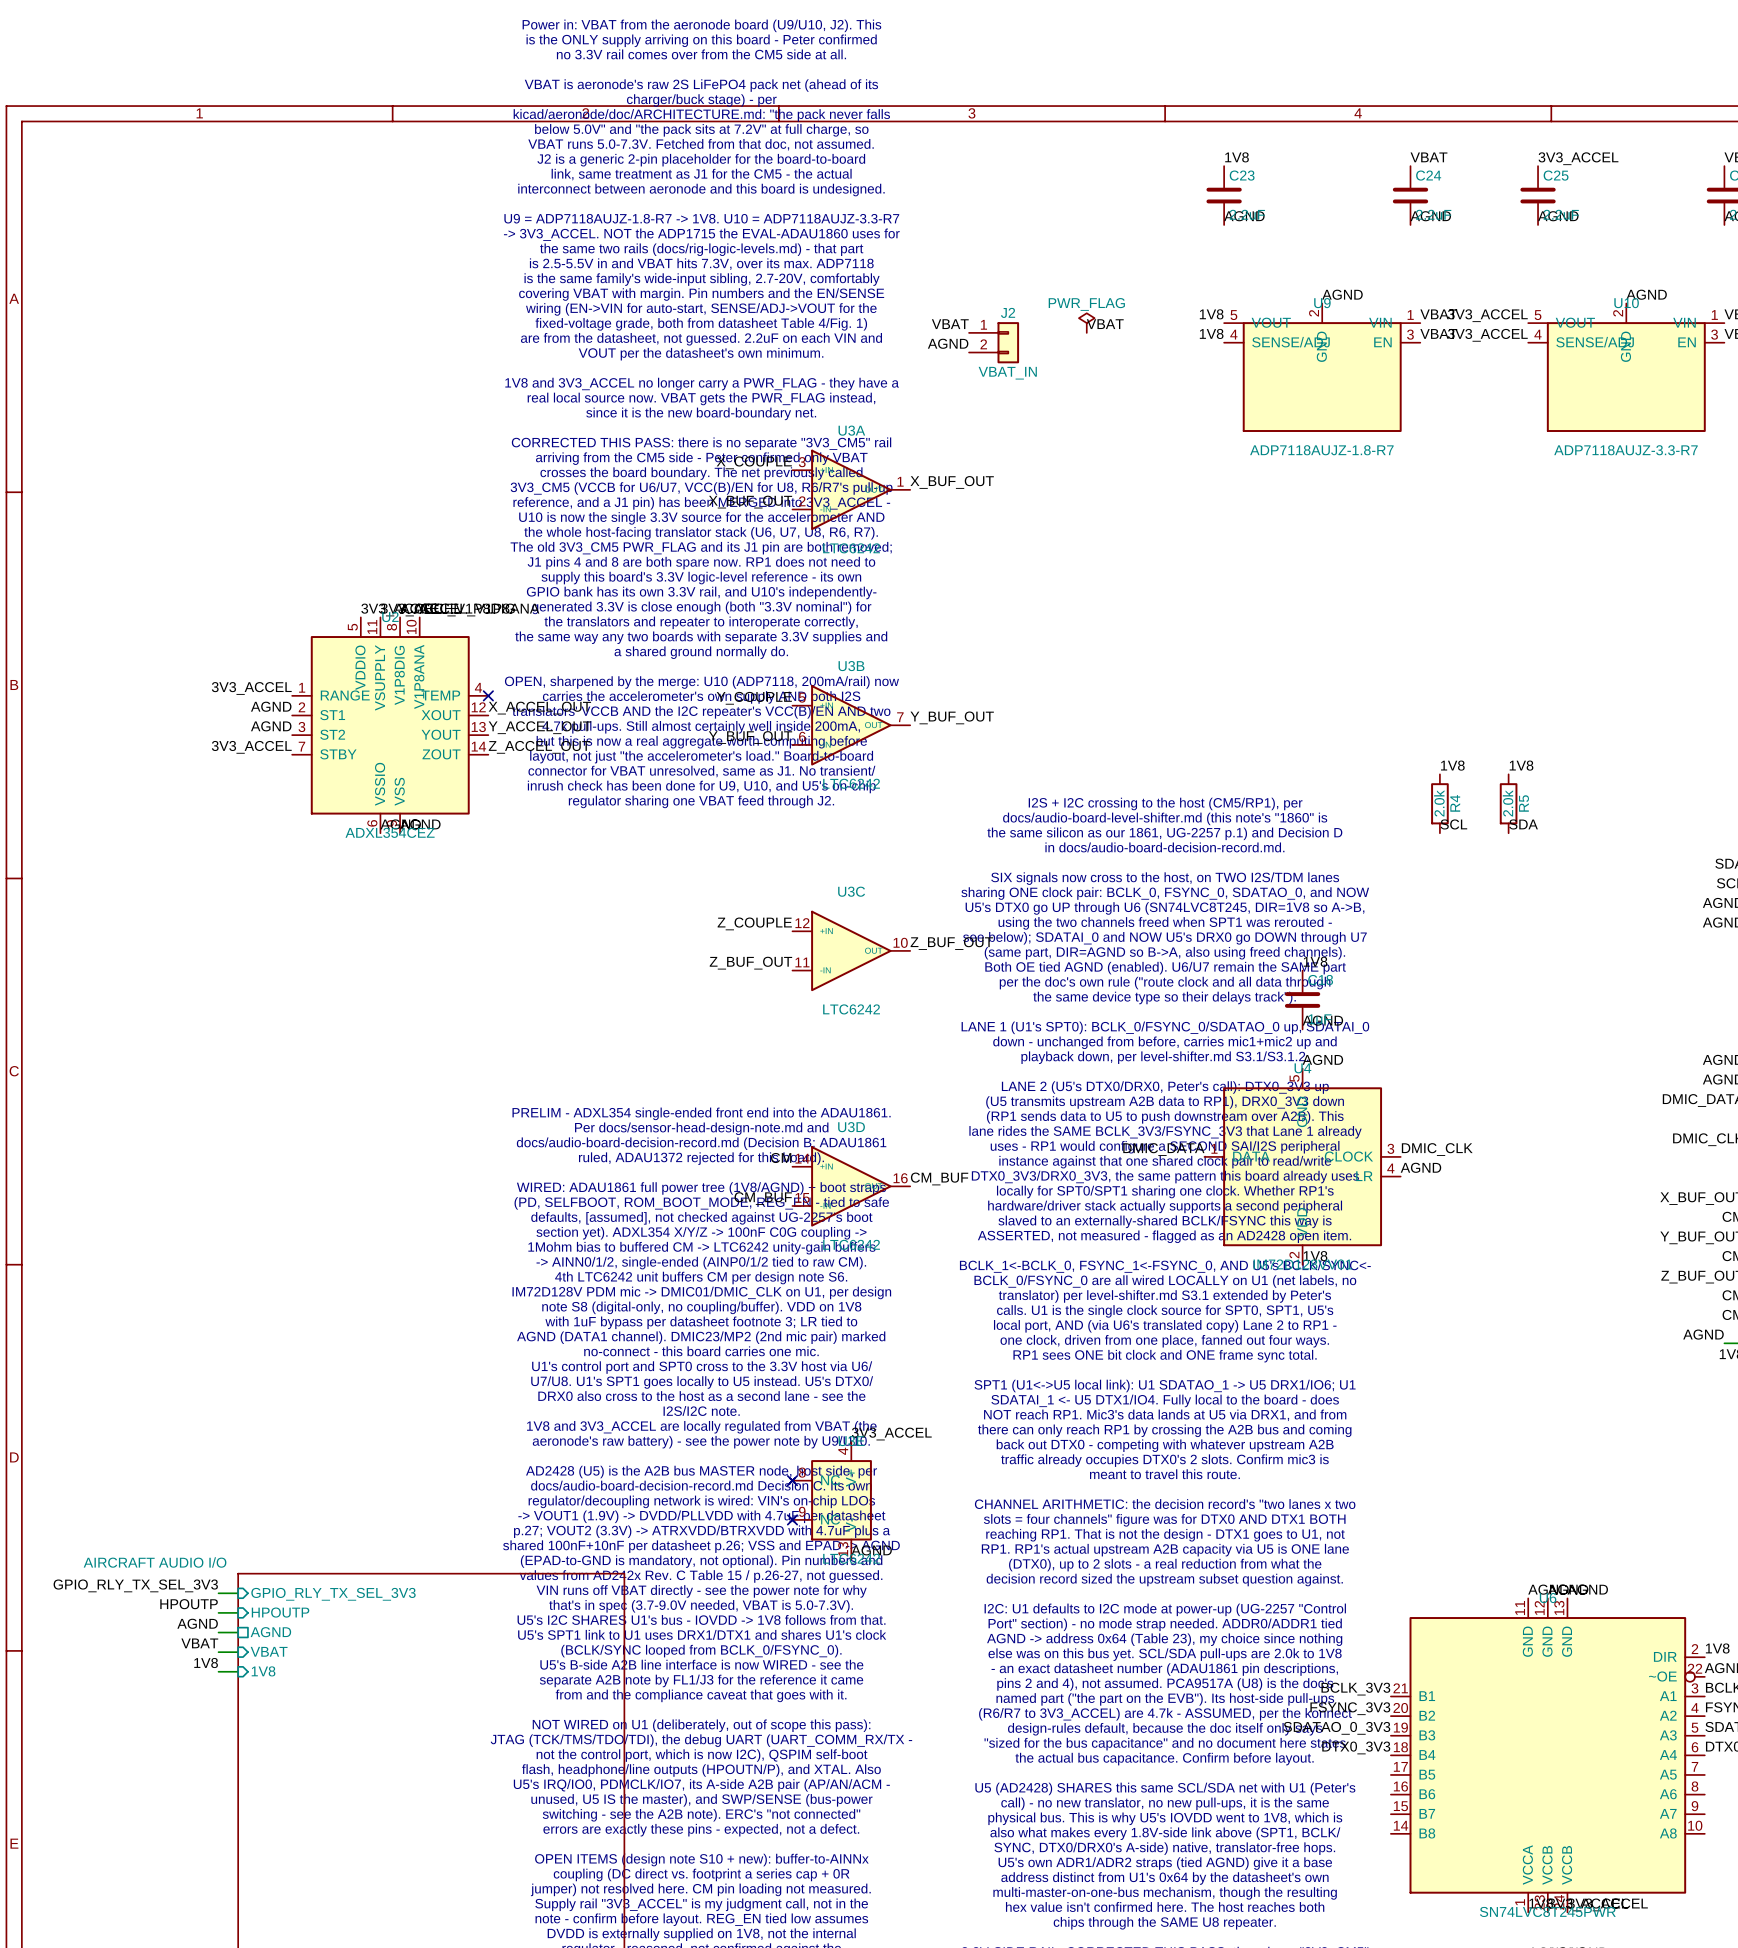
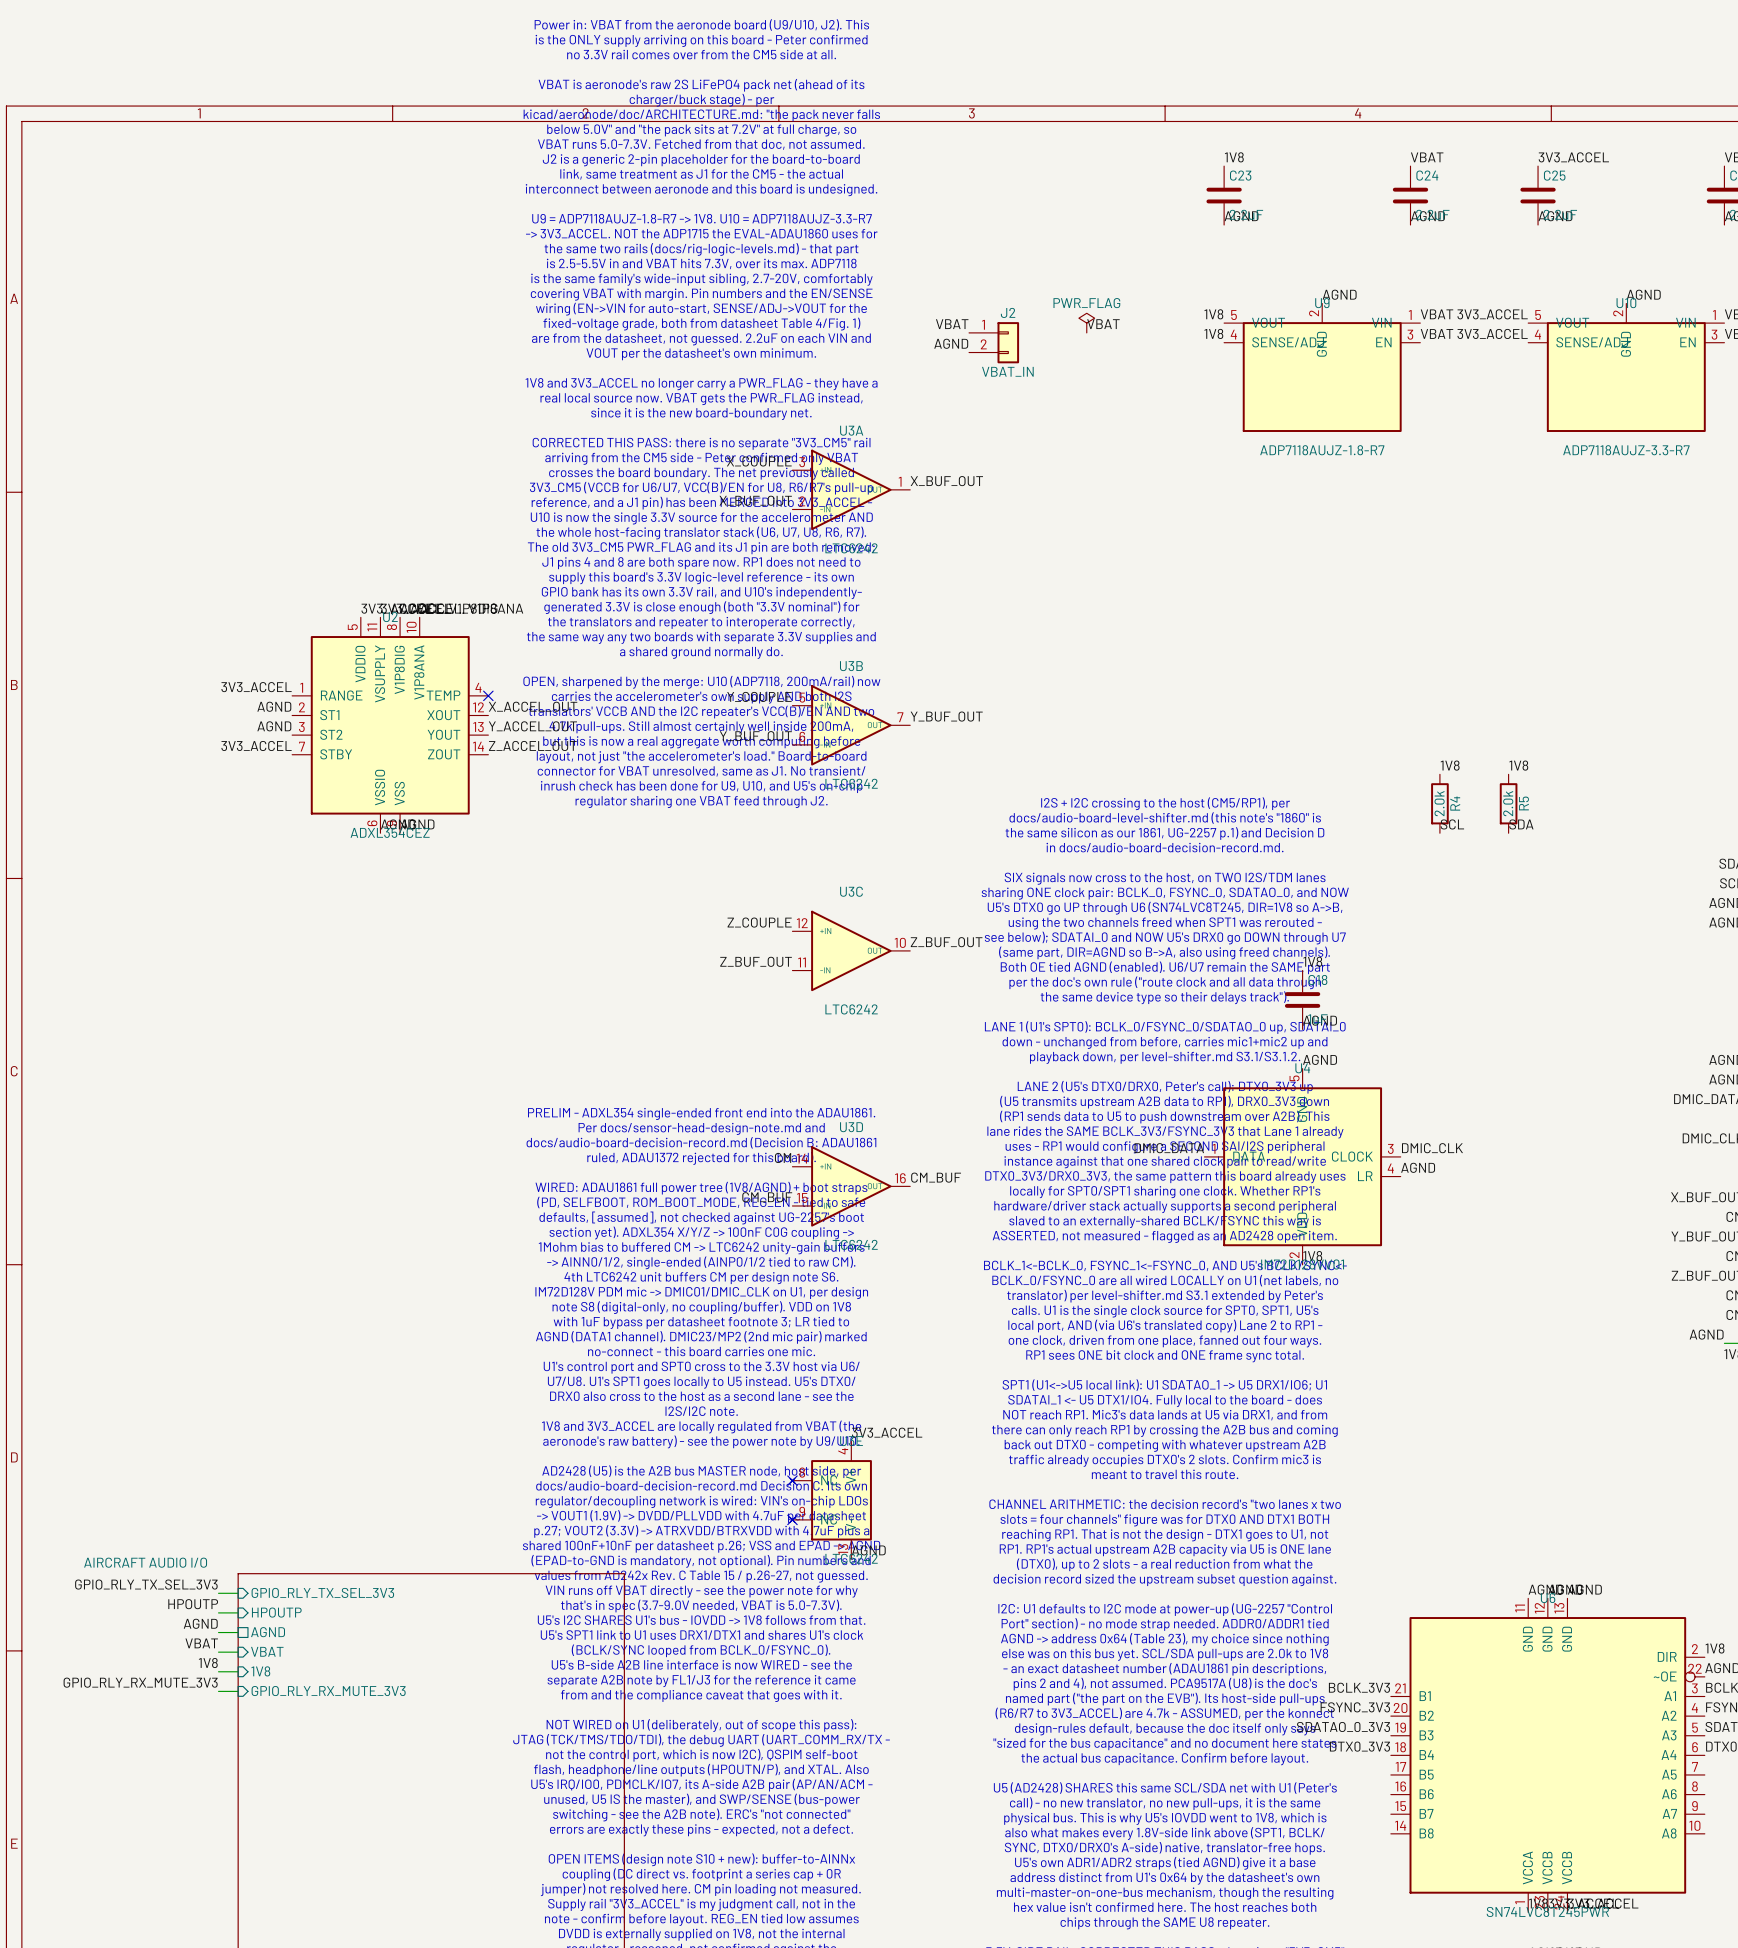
label: none -> GPIO_RLY_RX_MUTE_3V3 (140, 1682)
wire: none -> (218, 1691) (238, 1691)
sheet pin: none -> GPIO_RLY_RX_MUTE_3V3 (328, 1691)

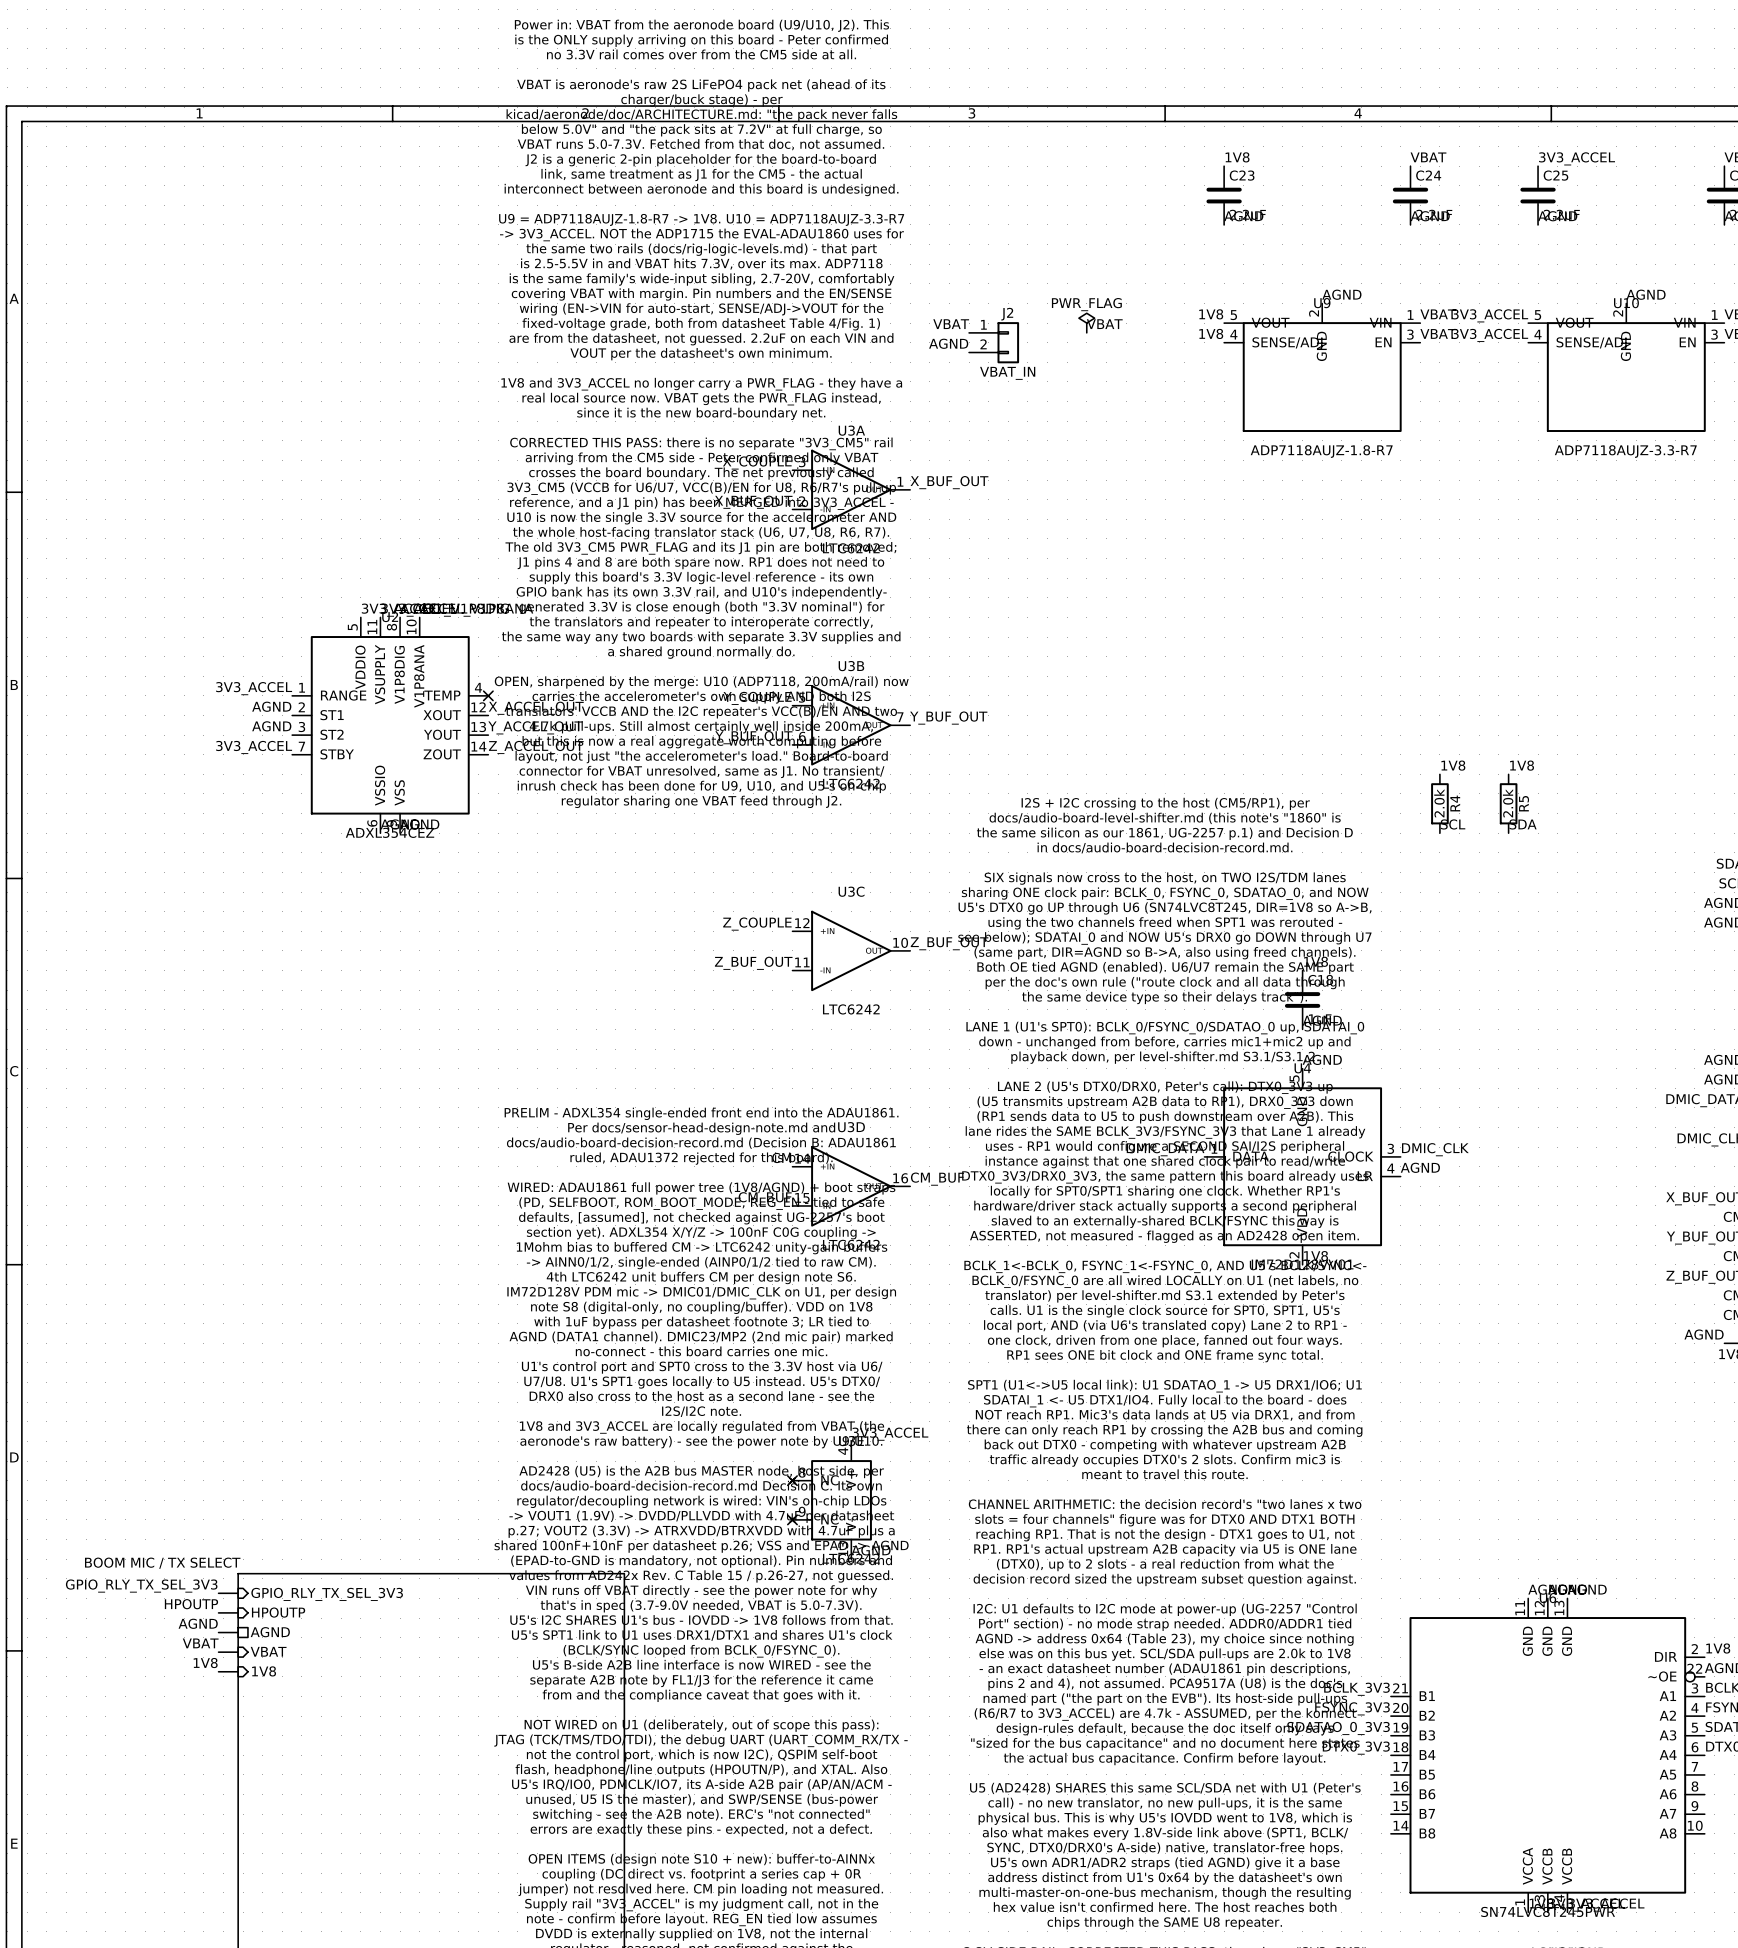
sheet AIRCRAFT AUDIO I/O name: AIRCRAFT AUDIO I/O (145, 1562) -> BOOM MIC / TX SELECT (162, 1563)
label: GPIO_RLY_RX_MUTE_3V3 (140, 1682) -> none
wire: (218, 1691) (238, 1691) -> none
sheet pin: GPIO_RLY_RX_MUTE_3V3 (328, 1691) -> none

